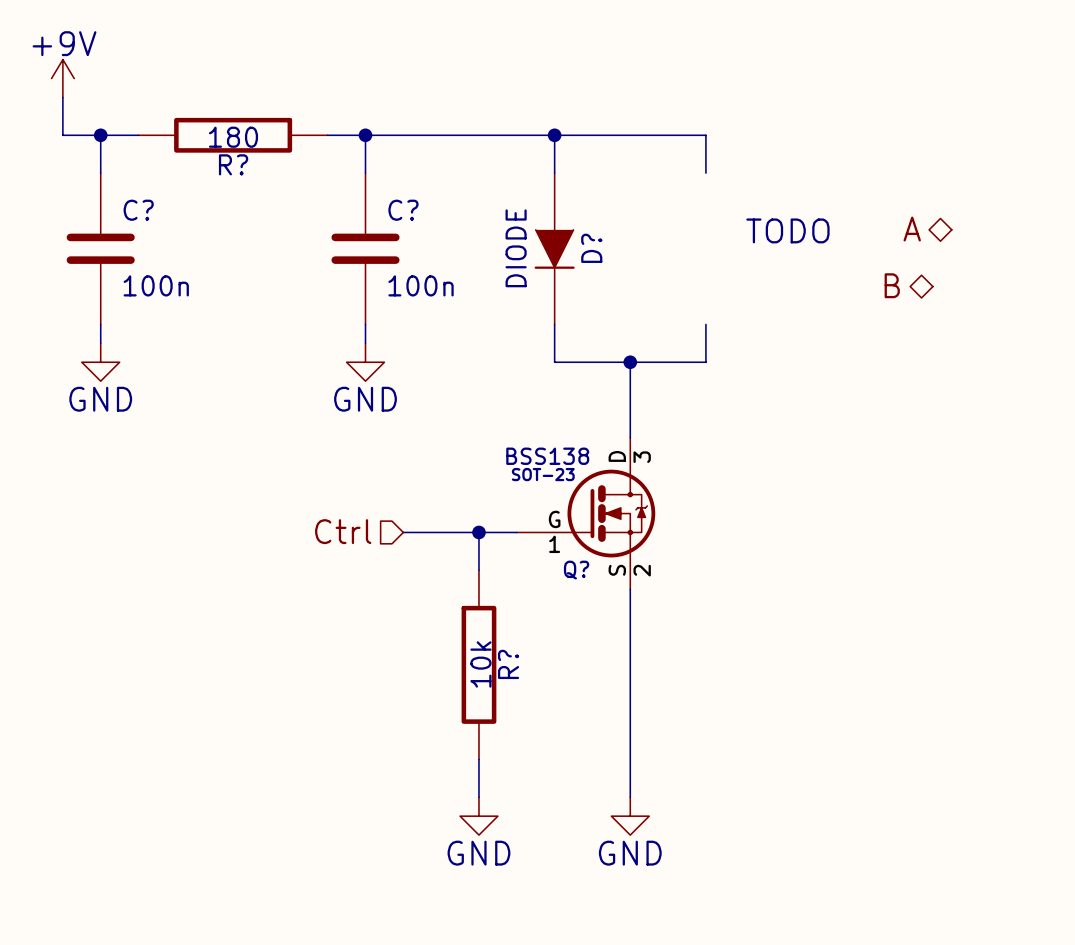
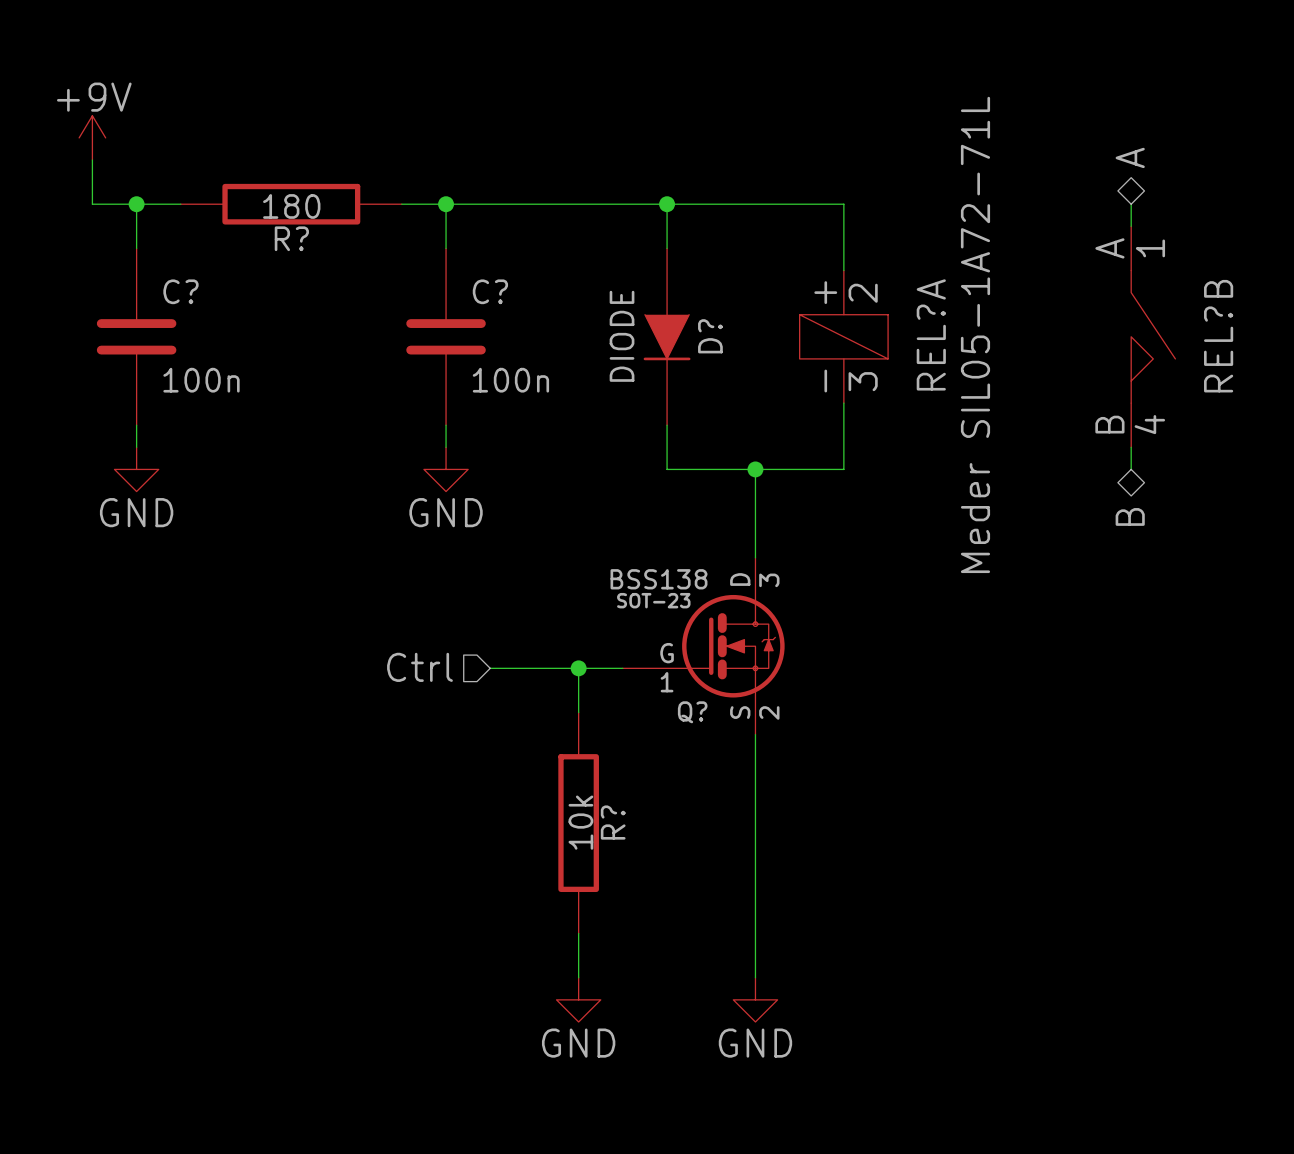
wire: none -> (1131, 204) (1131, 226)
wire: none -> (843, 248) (843, 270)
hierarchical label rotation: 0° (912, 229) -> 90° clockwise (1130, 157)
hierarchical label position: A (912, 229) -> A (1130, 157)
text: TODO (787, 230) -> none
REL?A: none -> Meder SIL05-1A72-71L (843, 336)
REL?B: none -> (1153, 336)
hierarchical label rotation: 0° (892, 285) -> 90° counterclockwise (1130, 516)
hierarchical label position: B (892, 285) -> B (1130, 516)
wire: none -> (843, 403) (843, 425)
wire: none -> (1131, 447) (1131, 469)

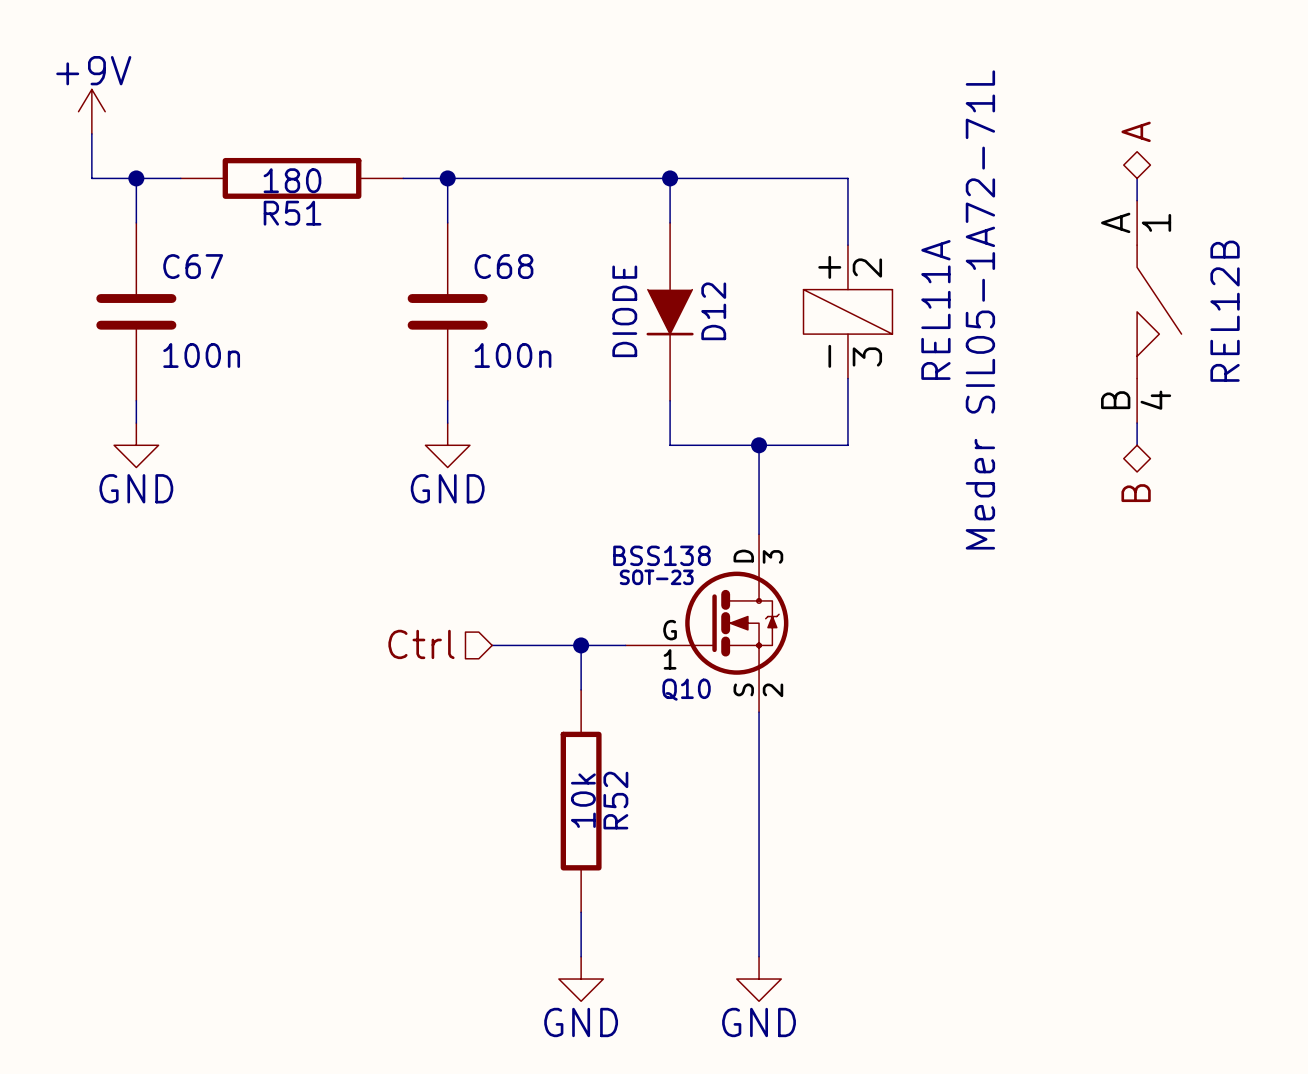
R? name: R? (291, 238) -> R51 (292, 213)
C? name: C? (180, 291) -> C67 (193, 266)
C? name: C? (490, 291) -> C68 (503, 266)
REL?A name: REL?A (931, 334) -> REL11A (935, 309)
D? name: D? (710, 336) -> D12 (713, 311)
REL?B name: REL?B (1218, 336) -> REL12B (1225, 311)
Q? name: Q? (692, 712) -> Q10 (686, 689)
R? name: R? (613, 822) -> R52 (615, 800)

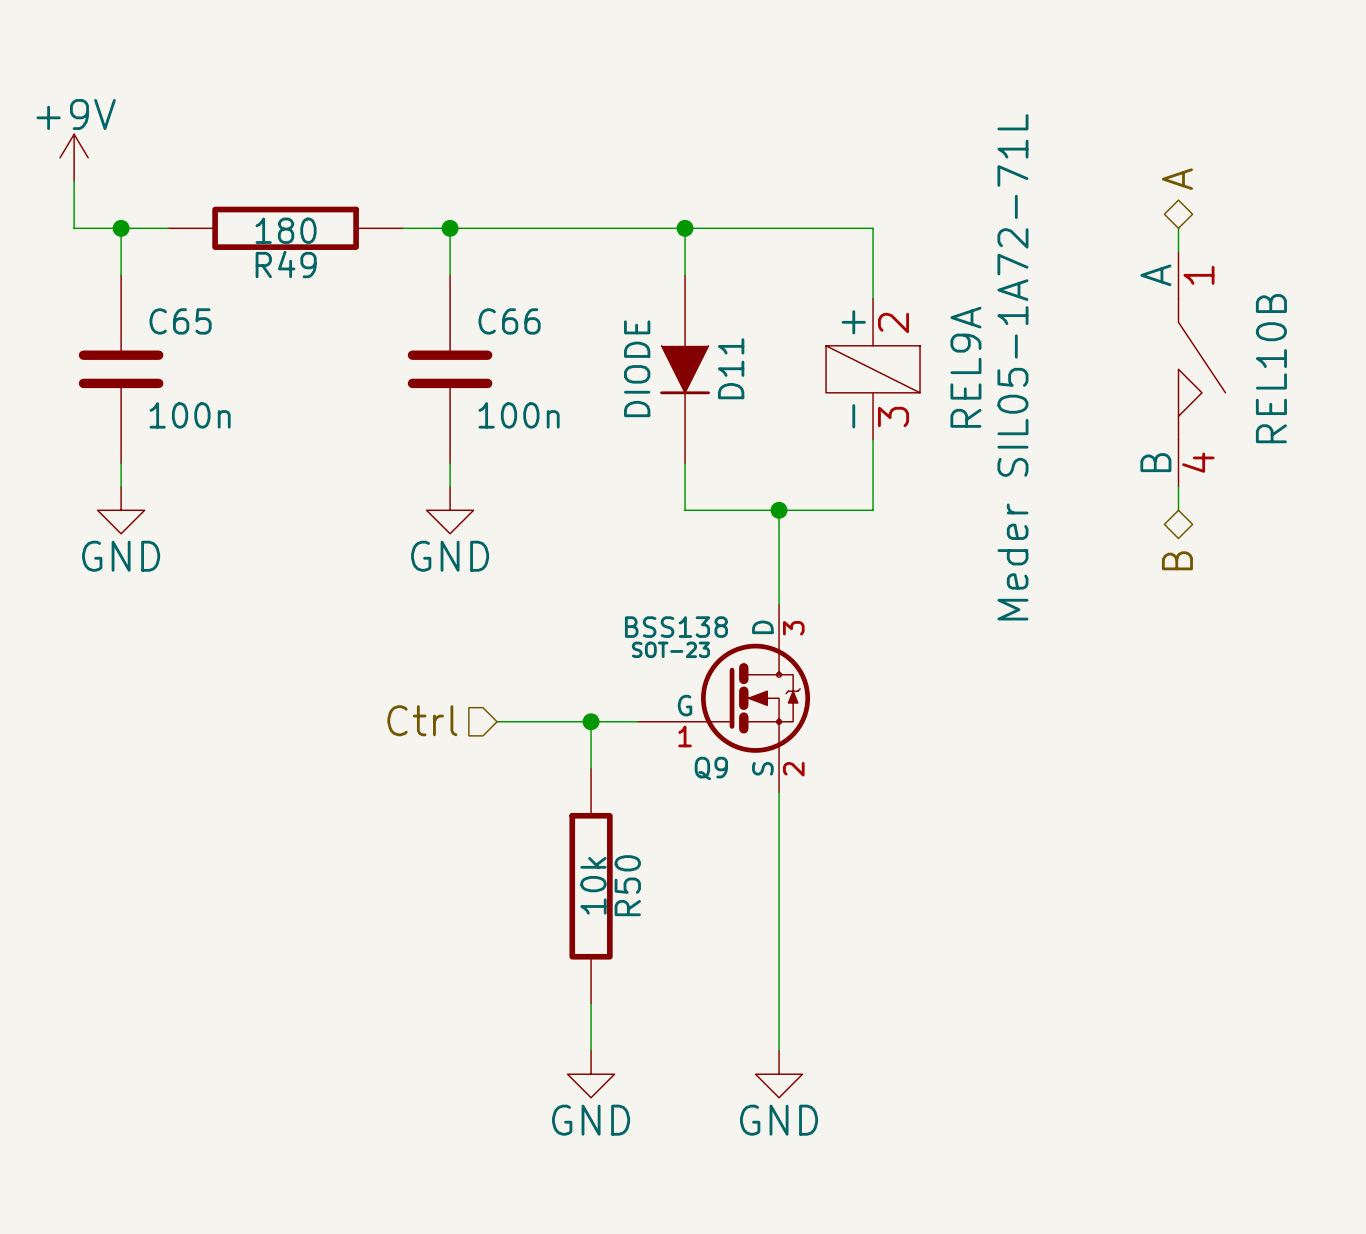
R51 name: R51 (292, 213) -> R49 (286, 264)
C67 name: C67 (193, 266) -> C65 (180, 321)
C68 name: C68 (503, 266) -> C66 (509, 321)
REL11A name: REL11A (935, 309) -> REL9A (965, 367)
D12 name: D12 (713, 311) -> D11 (731, 368)
REL12B name: REL12B (1225, 311) -> REL10B (1271, 368)
Q10 name: Q10 (686, 689) -> Q9 (711, 768)
R52 name: R52 (615, 800) -> R50 (627, 885)

